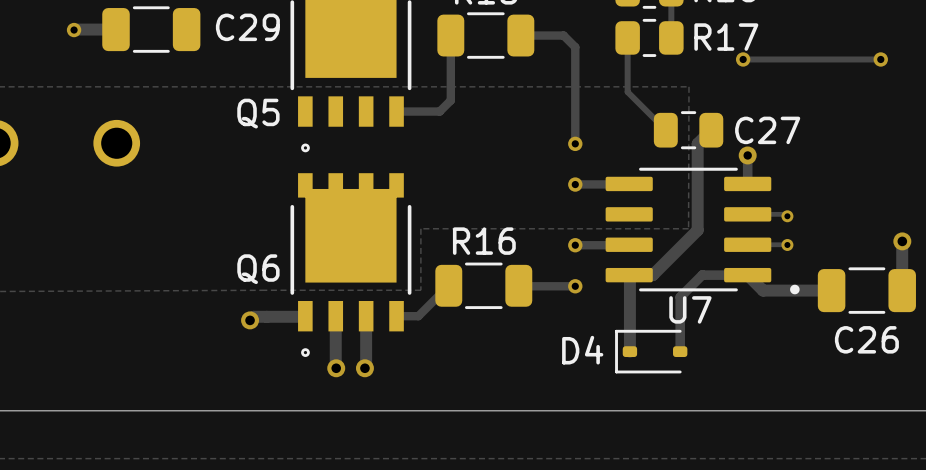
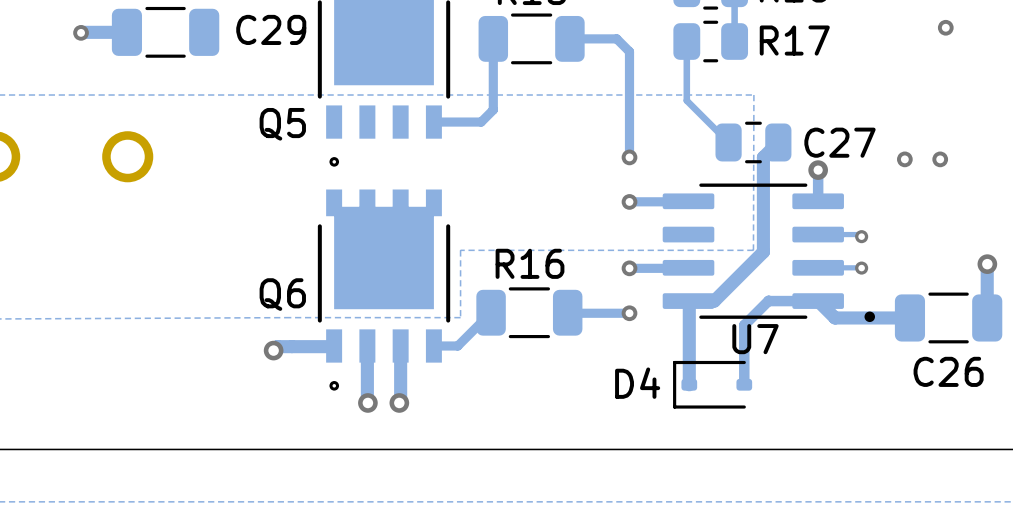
via: (743, 59) -> none
track: (880, 59) (743, 59) -> none
via position: (880, 59) -> (945, 27)
via: none -> (904, 159)
via: none -> (940, 159)

